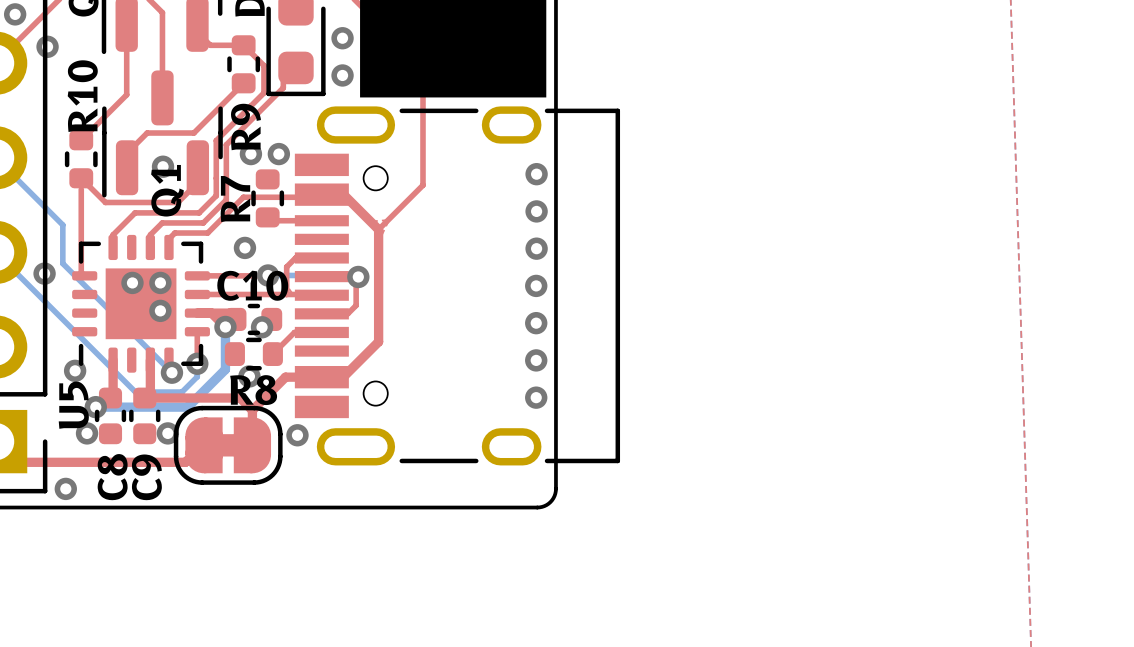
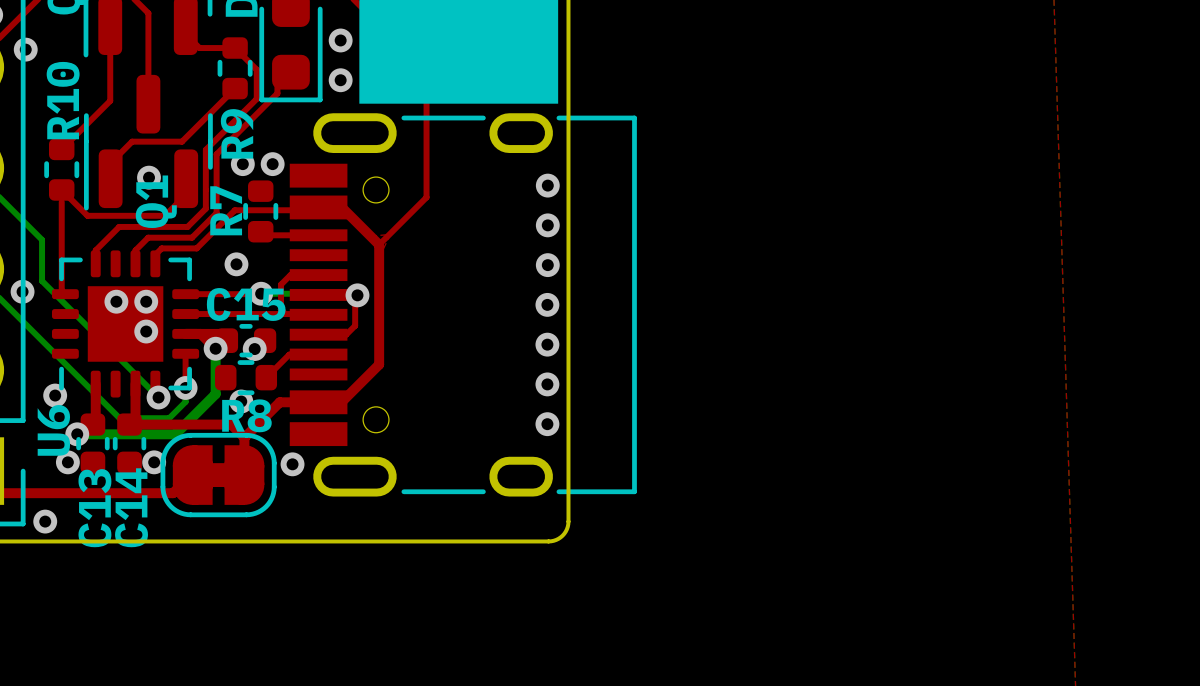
C10 name: C10 (252, 285) -> C15 (246, 304)
U5 name: U5 (73, 405) -> U6 (53, 430)
C8 name: C8 (112, 477) -> C13 (94, 508)
C9 name: C9 (146, 477) -> C14 (131, 507)

